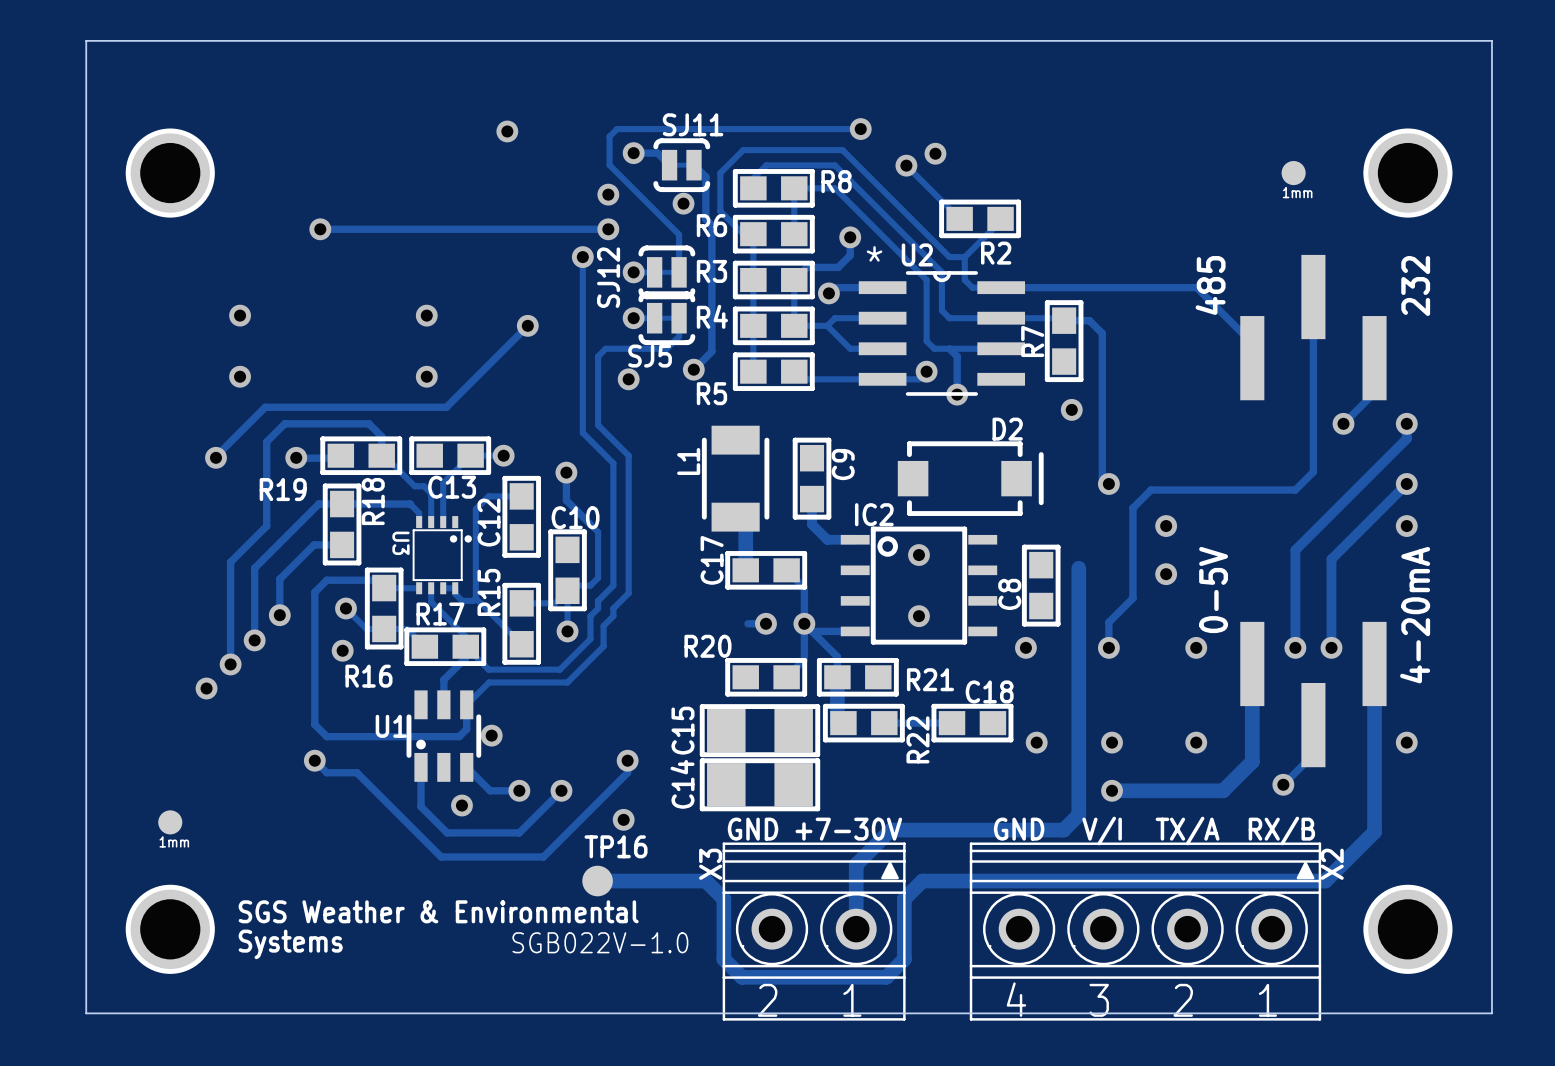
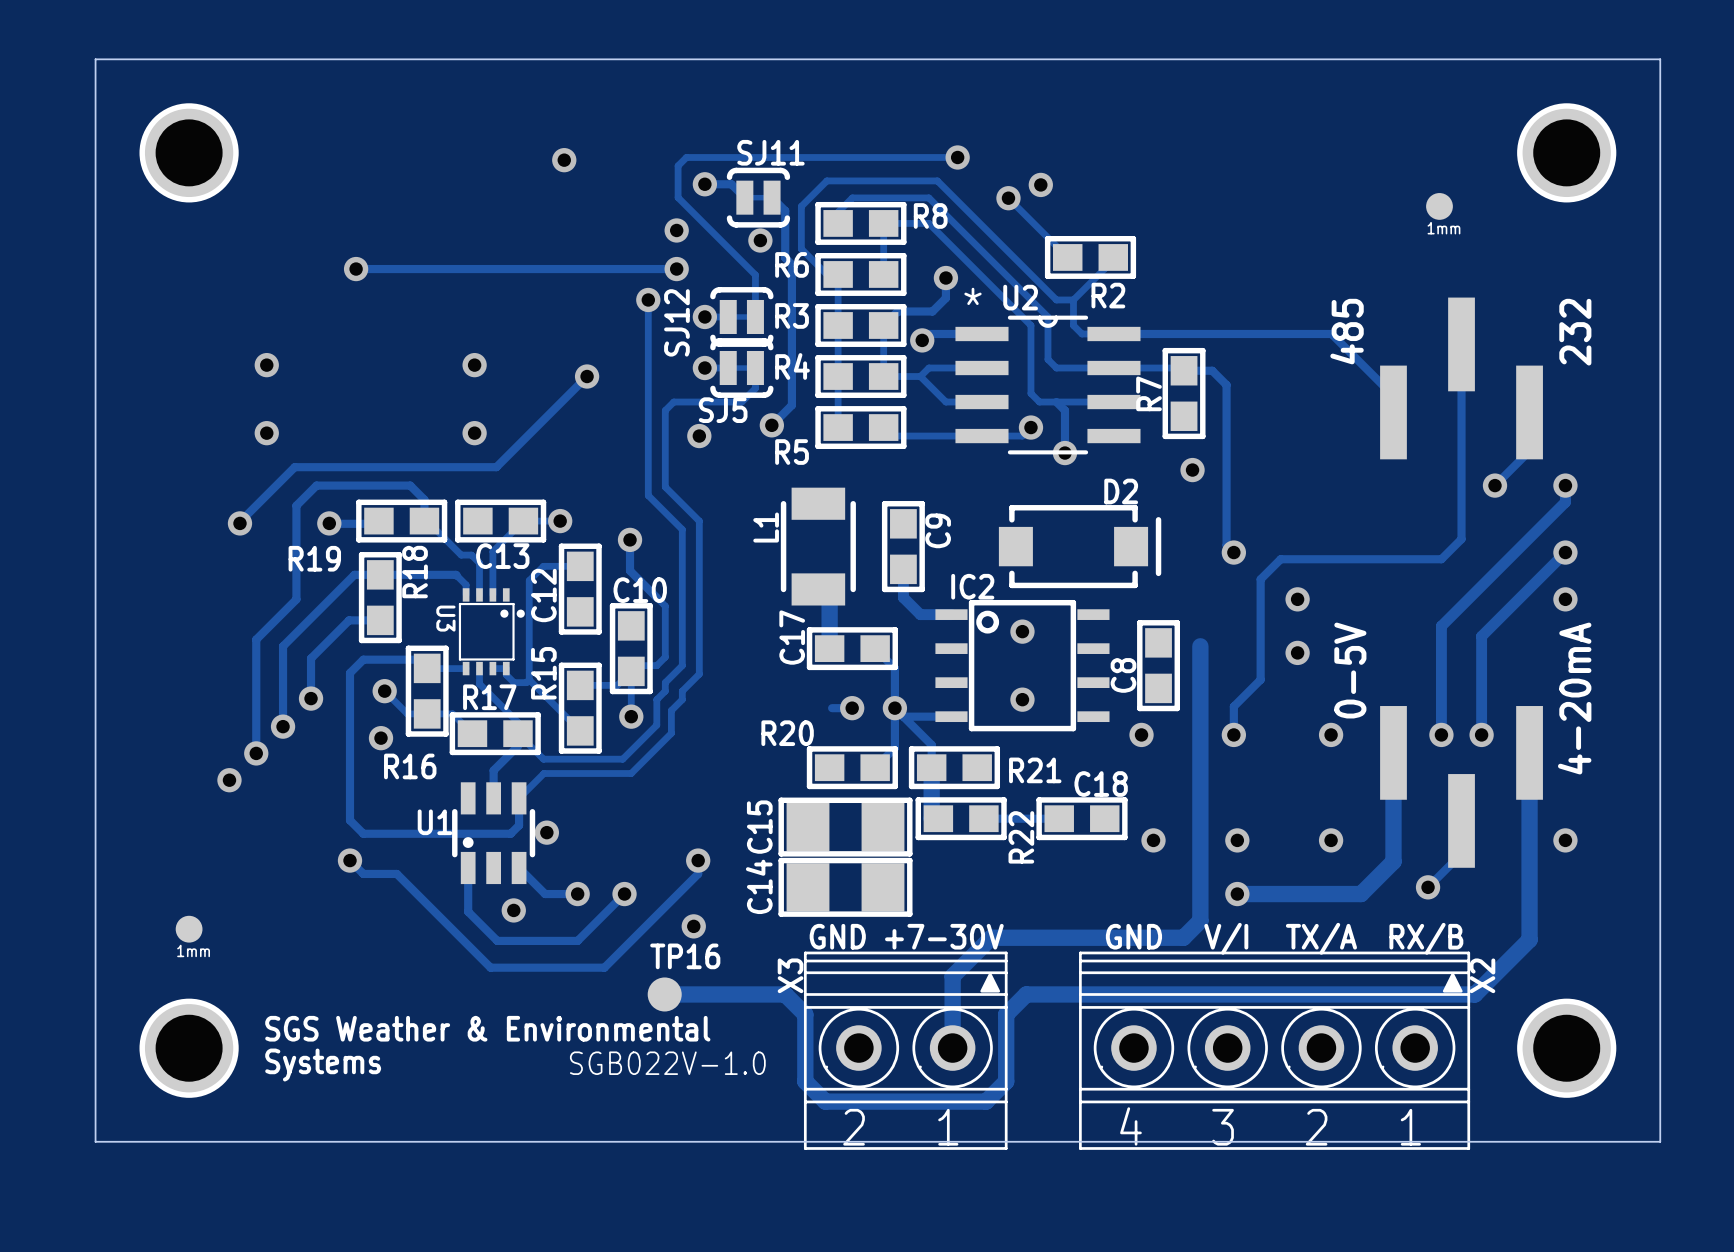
part position: (170, 173) -> (189, 152)
part position: (1407, 173) -> (1566, 152)

